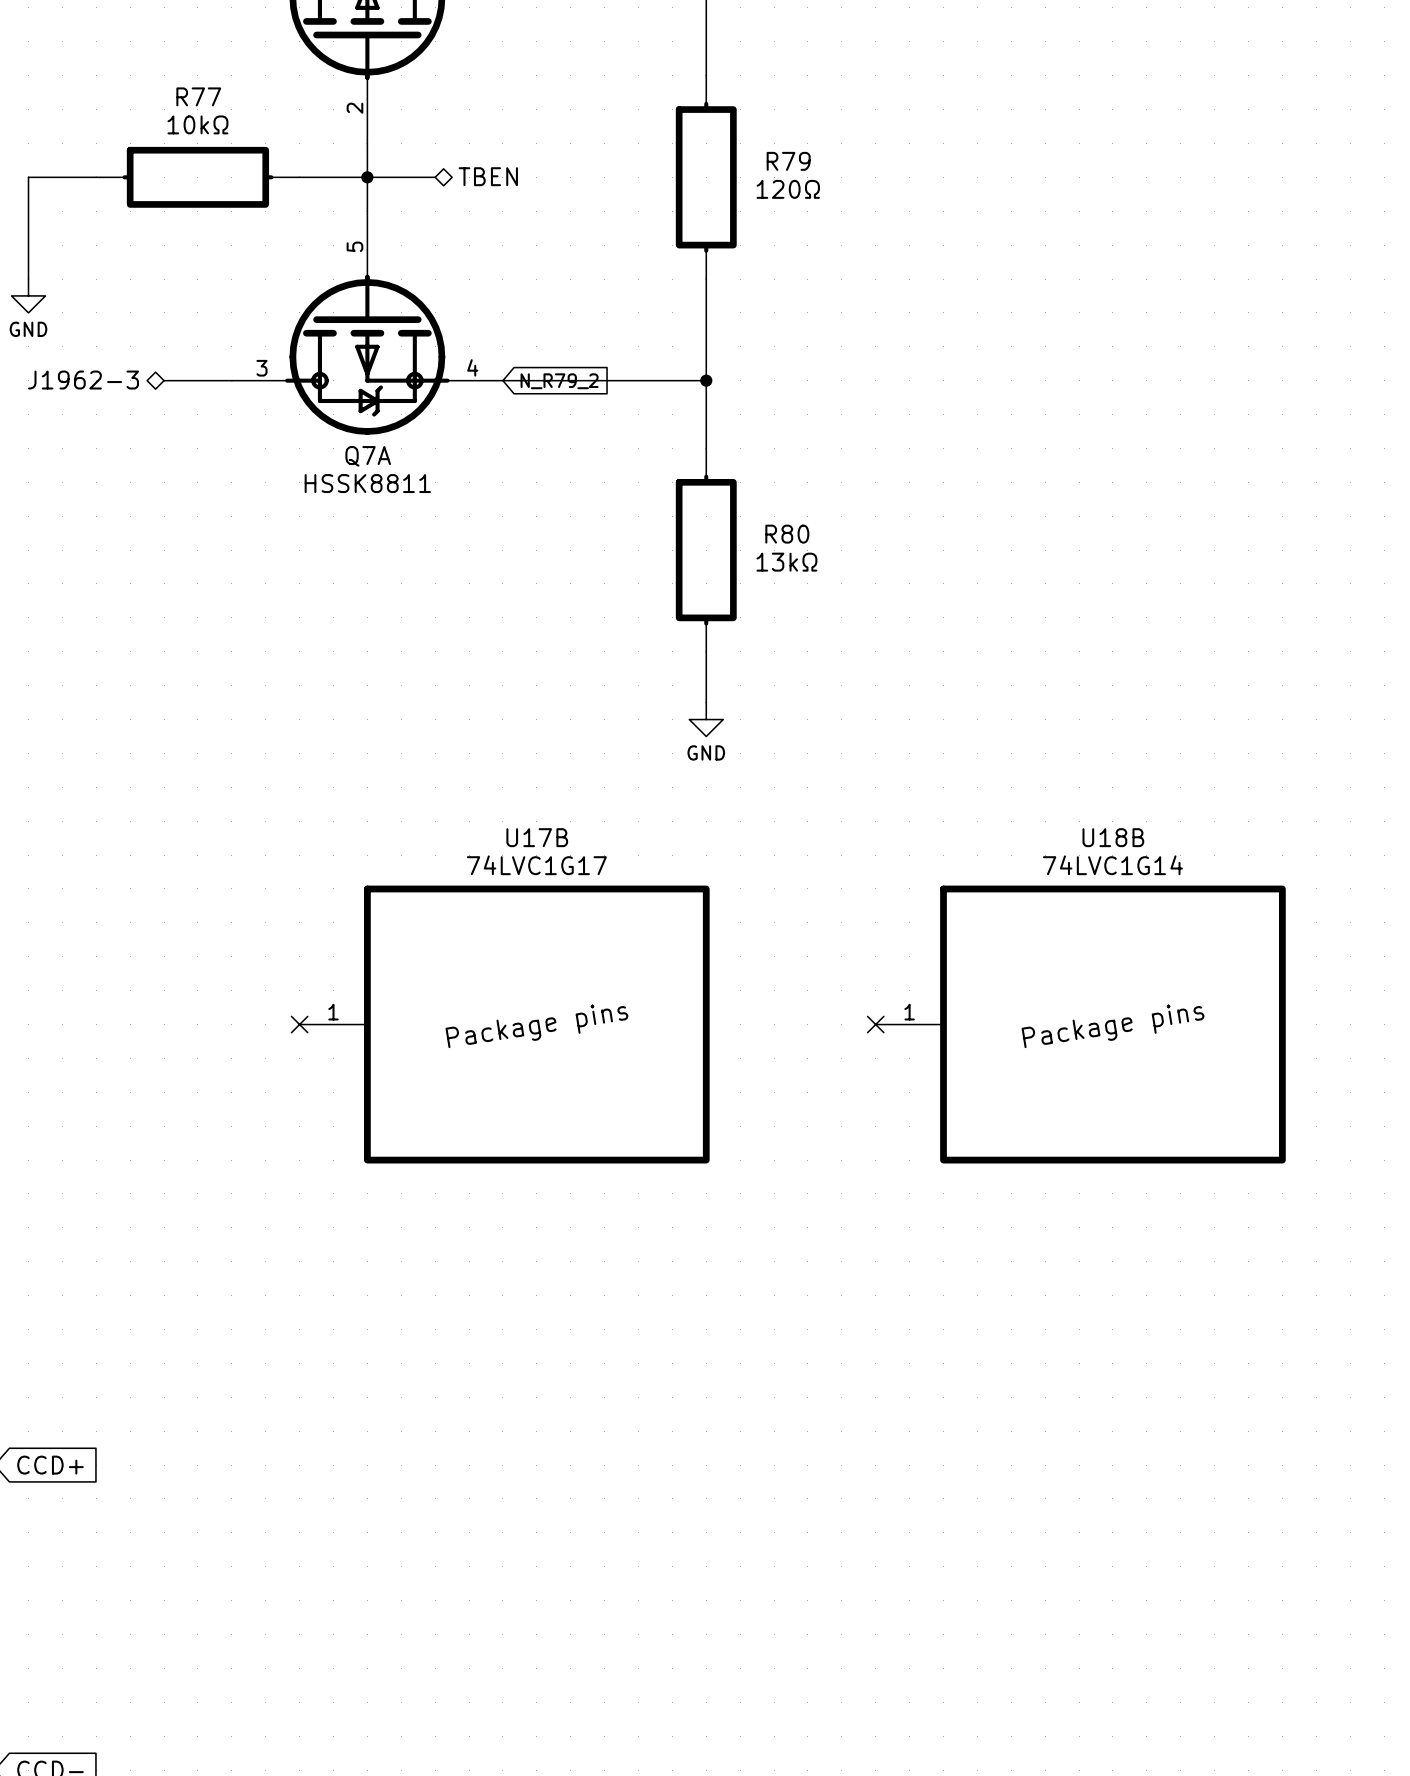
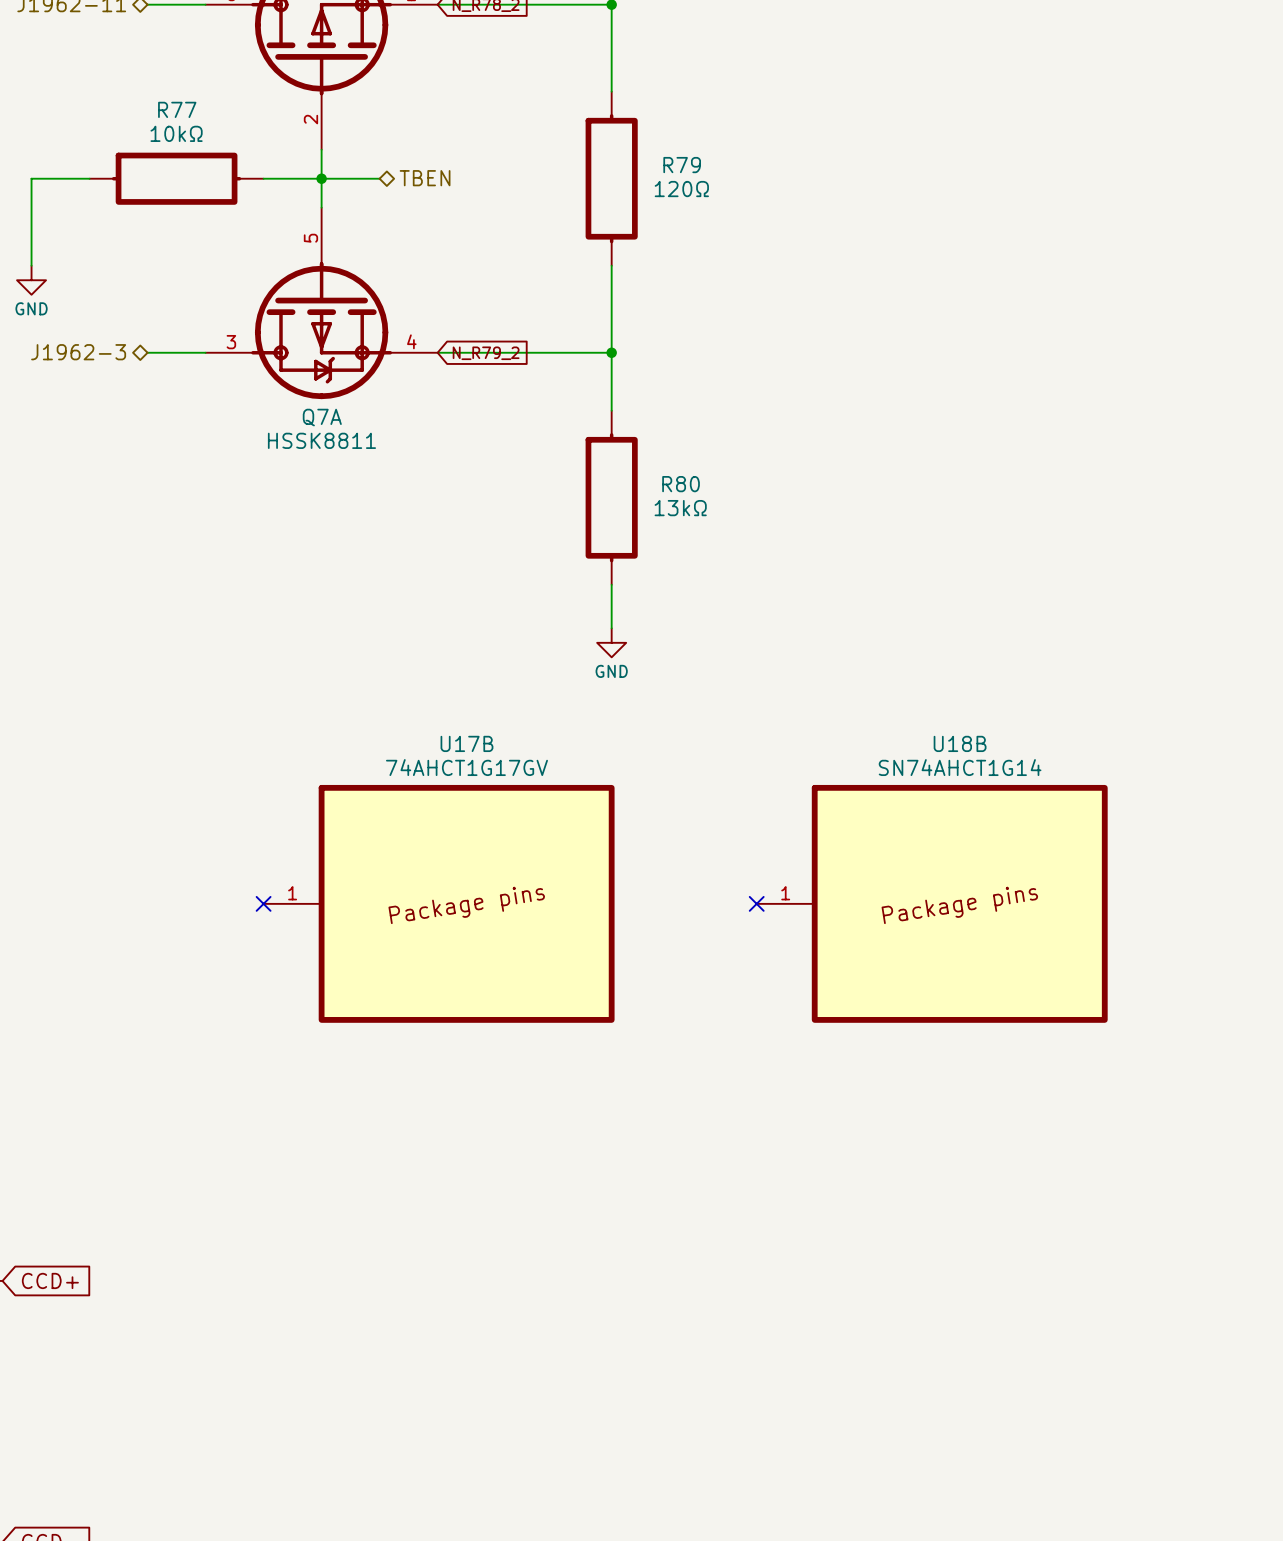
U17B value: 74LVC1G17 (536, 865) -> 74AHCT1G17GV (466, 767)
U18B value: 74LVC1G14 (1112, 865) -> SN74AHCT1G14 (960, 767)

